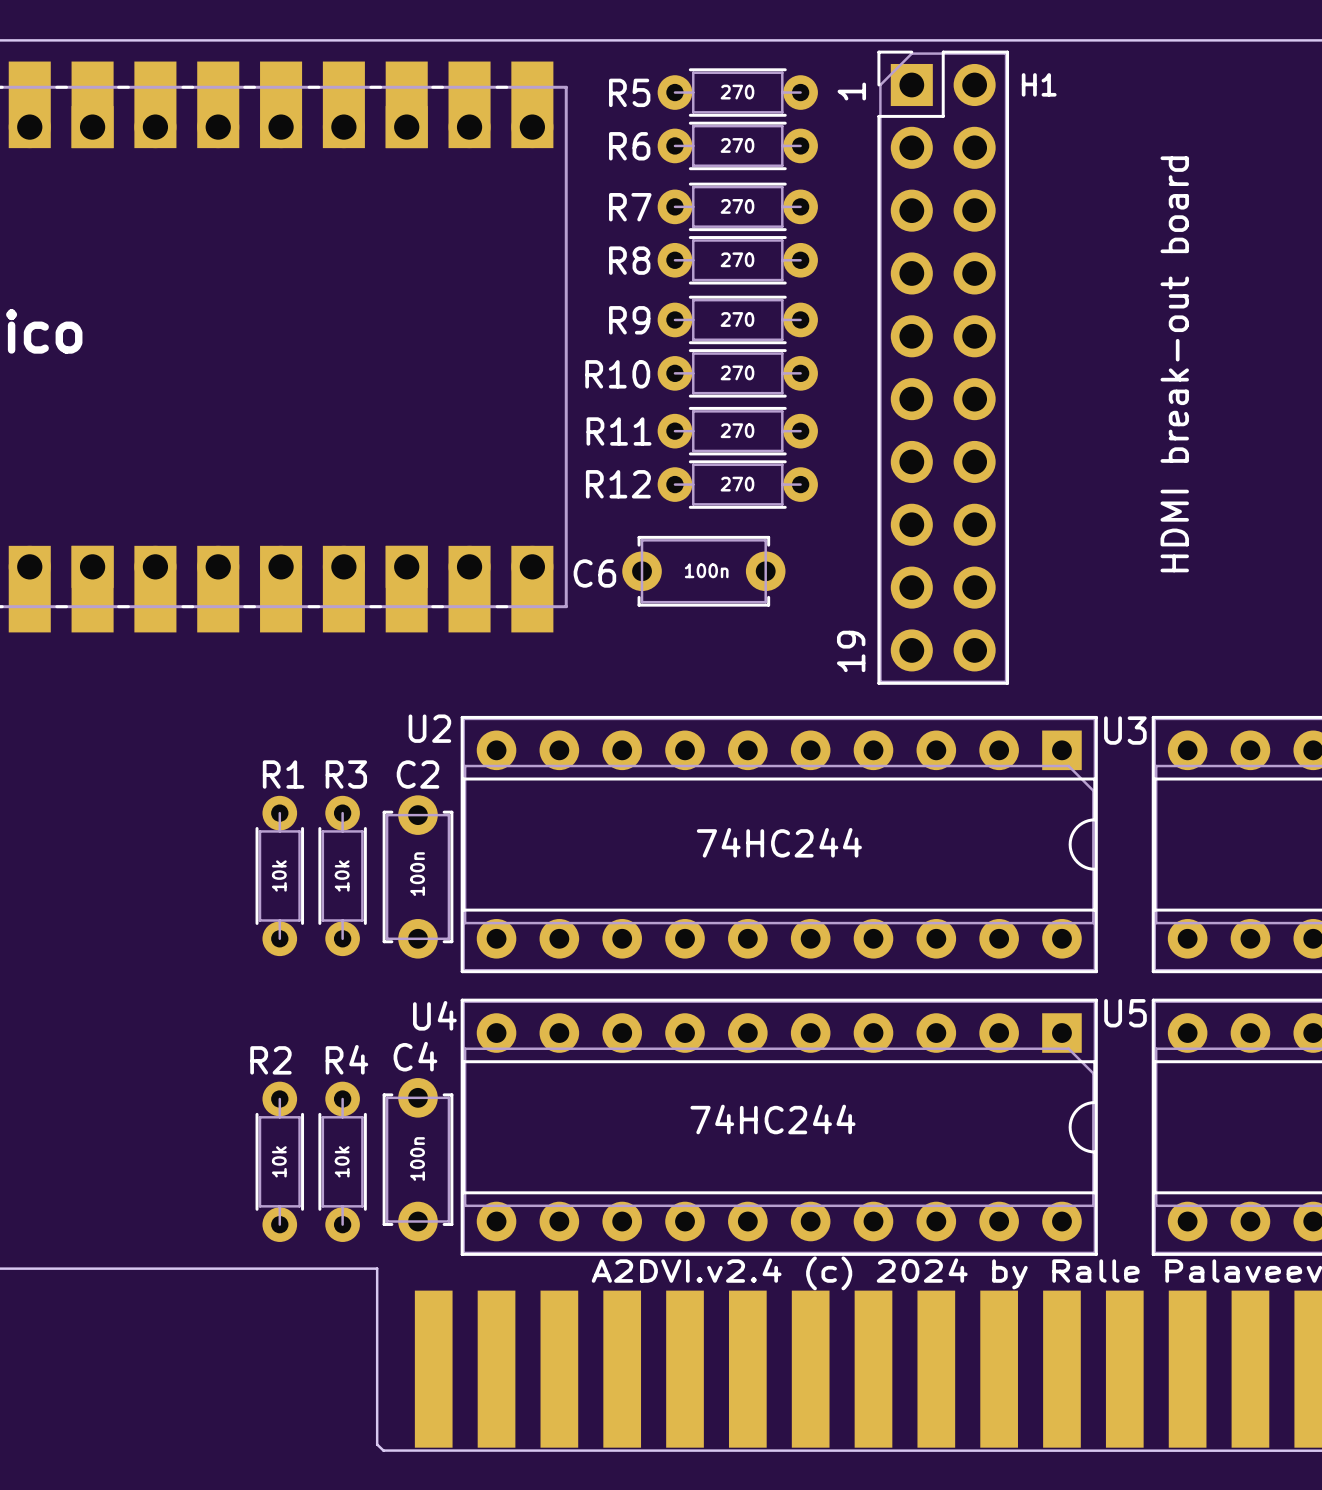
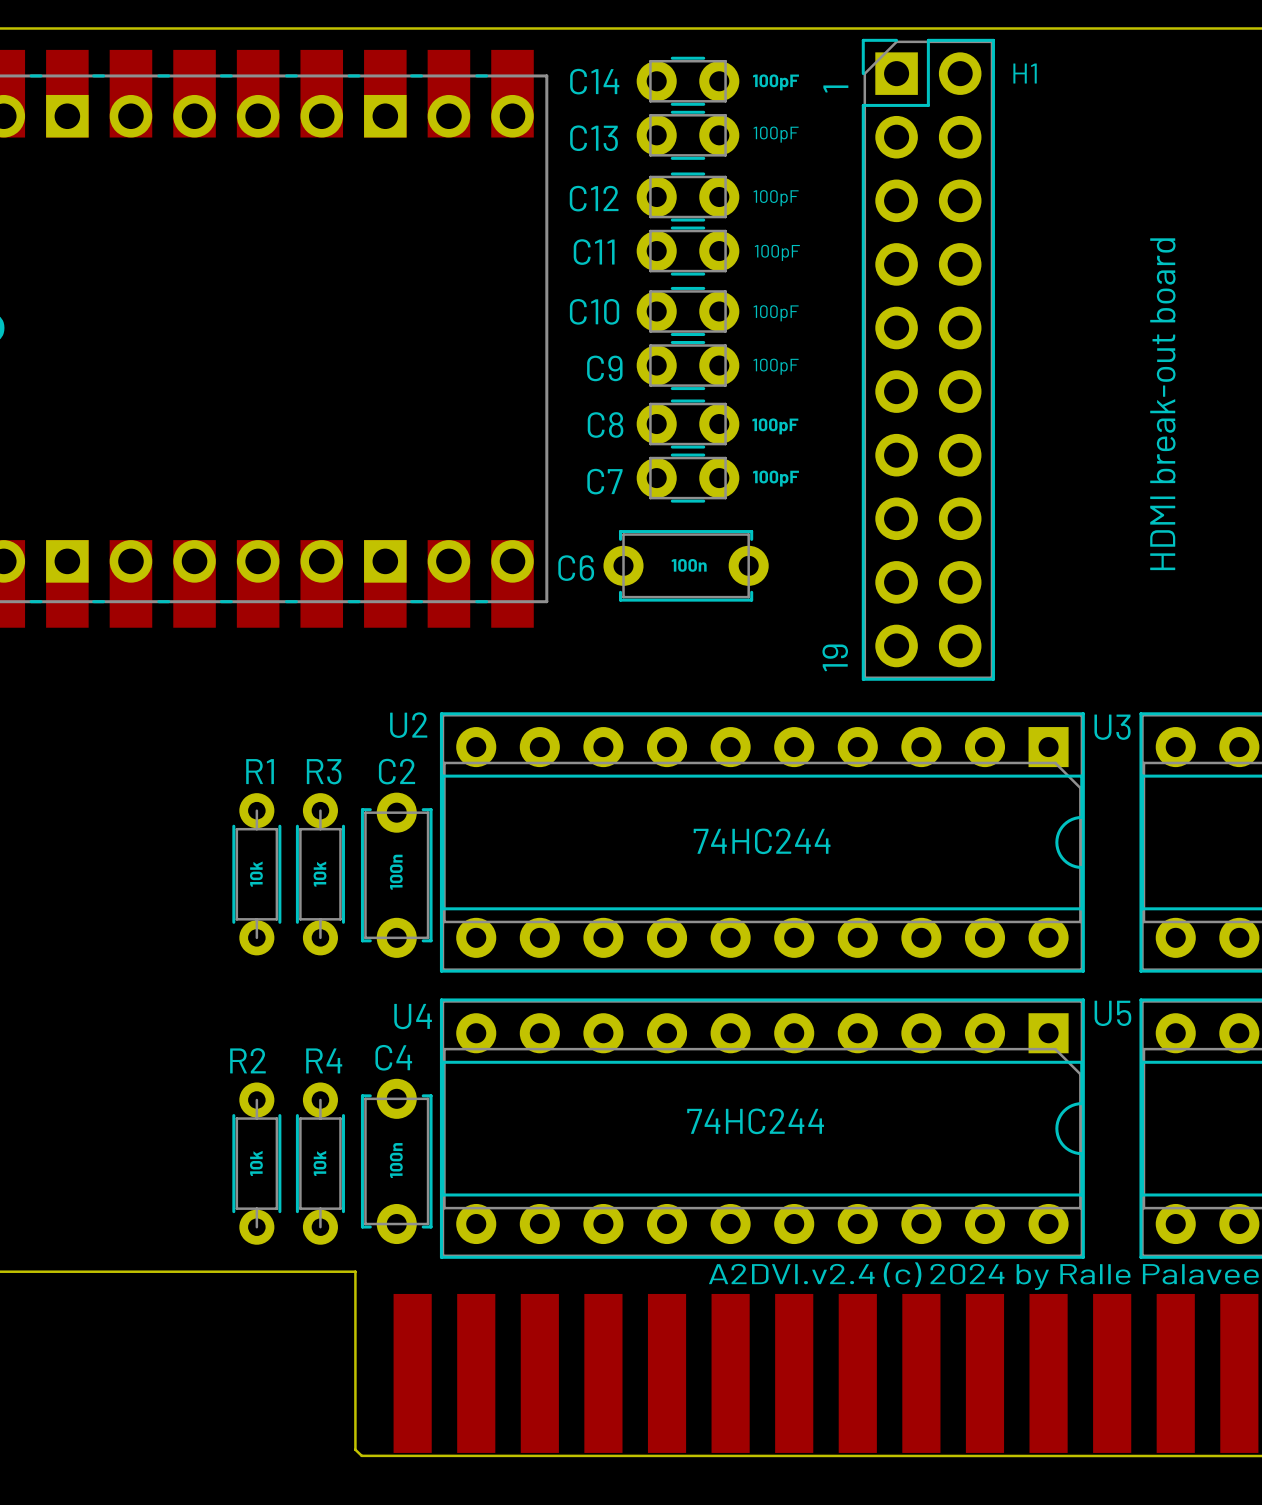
C14: none -> 100pF (688, 81)
R5: 270 (737, 92) -> none
C13: none -> 100pF (688, 135)
R6: 270 (737, 145) -> none
C12: none -> 100pF (688, 197)
R7: 270 (737, 206) -> none
C11: none -> 100pF (688, 251)
R8: 270 (737, 260) -> none
C10: none -> 100pF (688, 311)
R9: 270 (737, 319) -> none
C9: none -> 100pF (688, 365)
R10: 270 (737, 373) -> none
C8: none -> 100pF (688, 424)
R11: 270 (737, 431) -> none
C7: none -> 100pF (688, 478)
R12: 270 (737, 484) -> none

